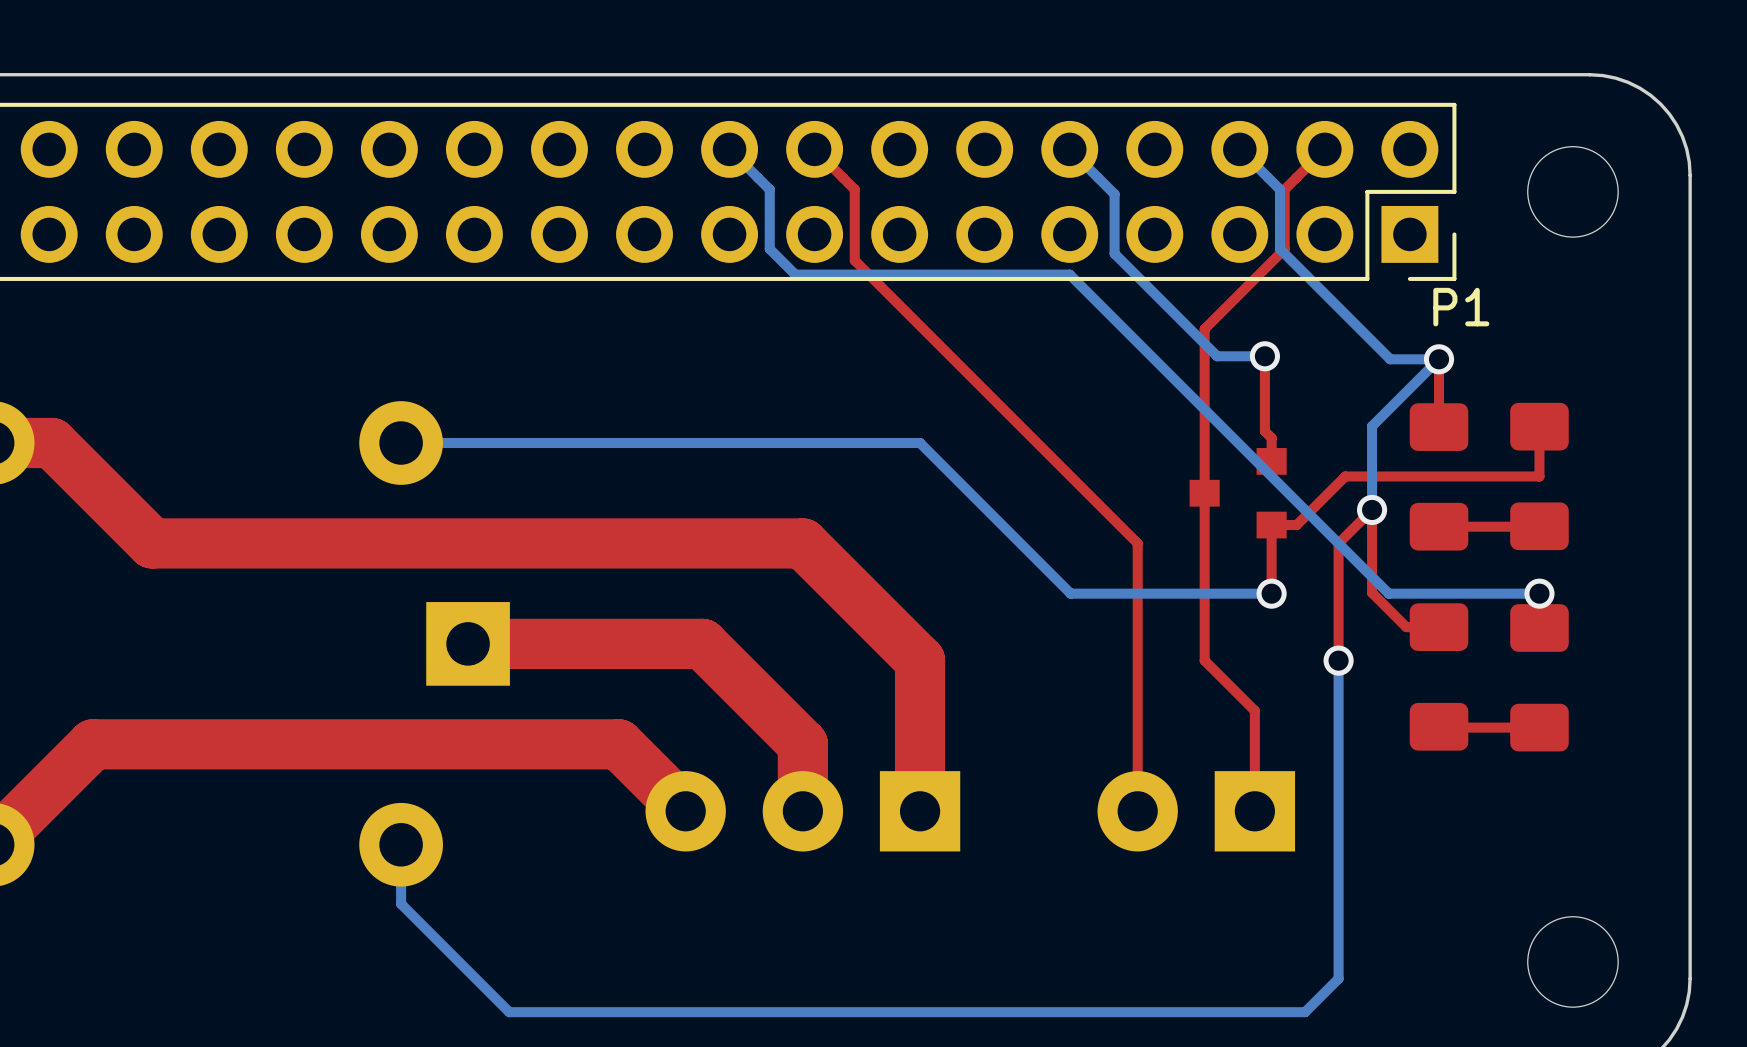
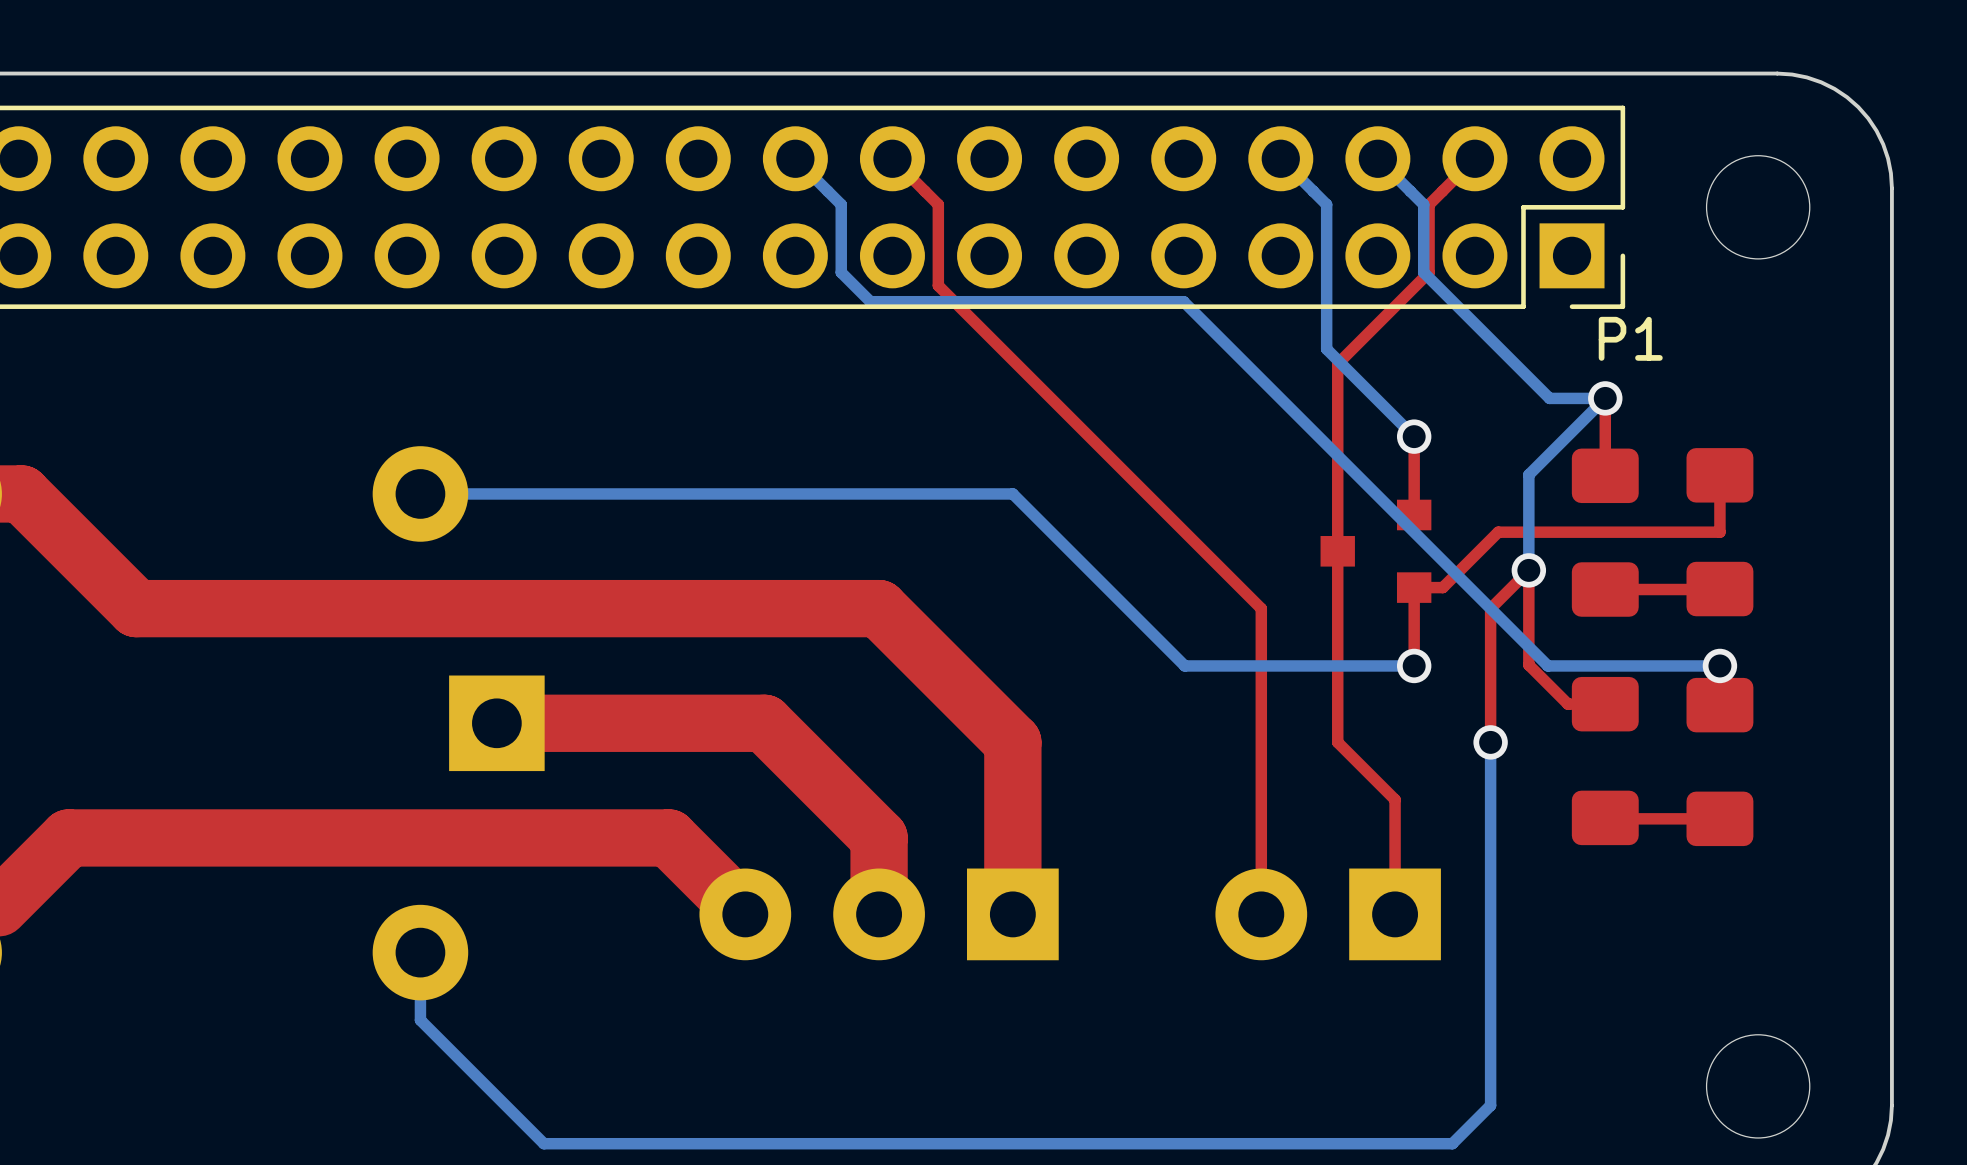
bottom track: (1069, 149) (1114, 194) (1114, 253) (1217, 356) (1264, 356) -> none
bottom track: none -> (1280, 158) (1326, 204) (1326, 349) (1414, 436)
top track: (1264, 356) (1264, 431) (1271, 437) -> (1414, 436) (1414, 488)
via position: (1264, 356) -> (1414, 436)

